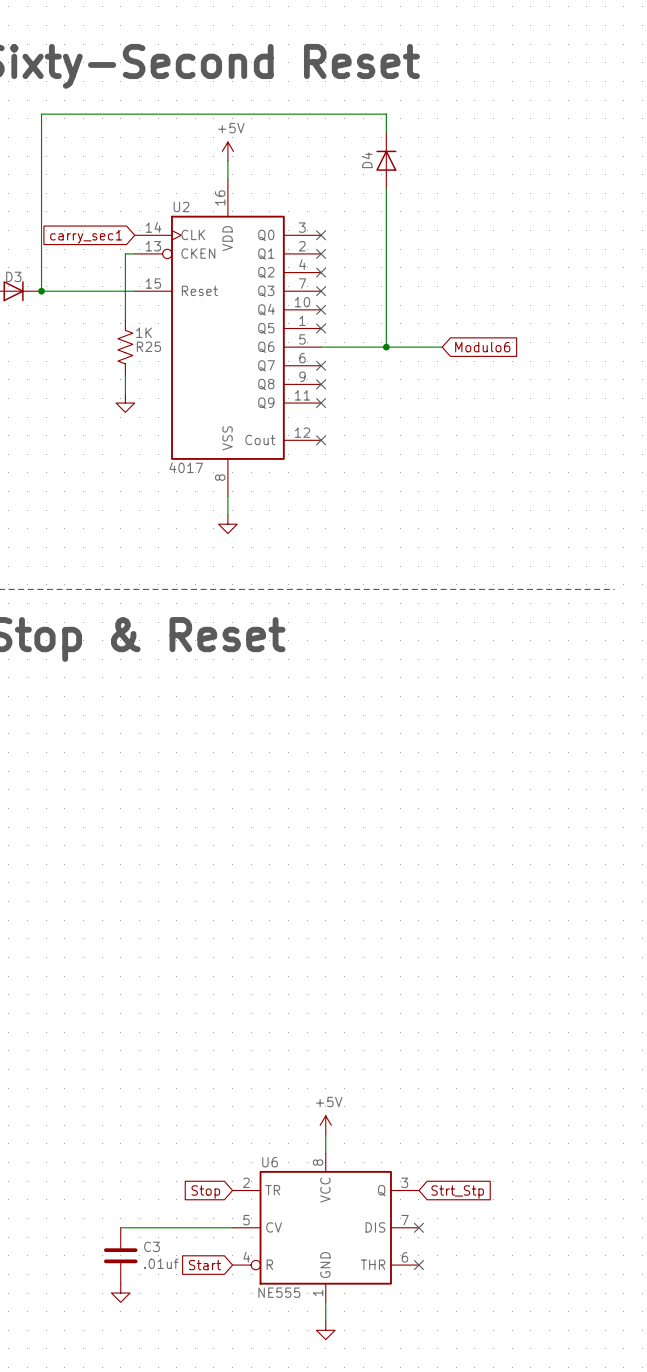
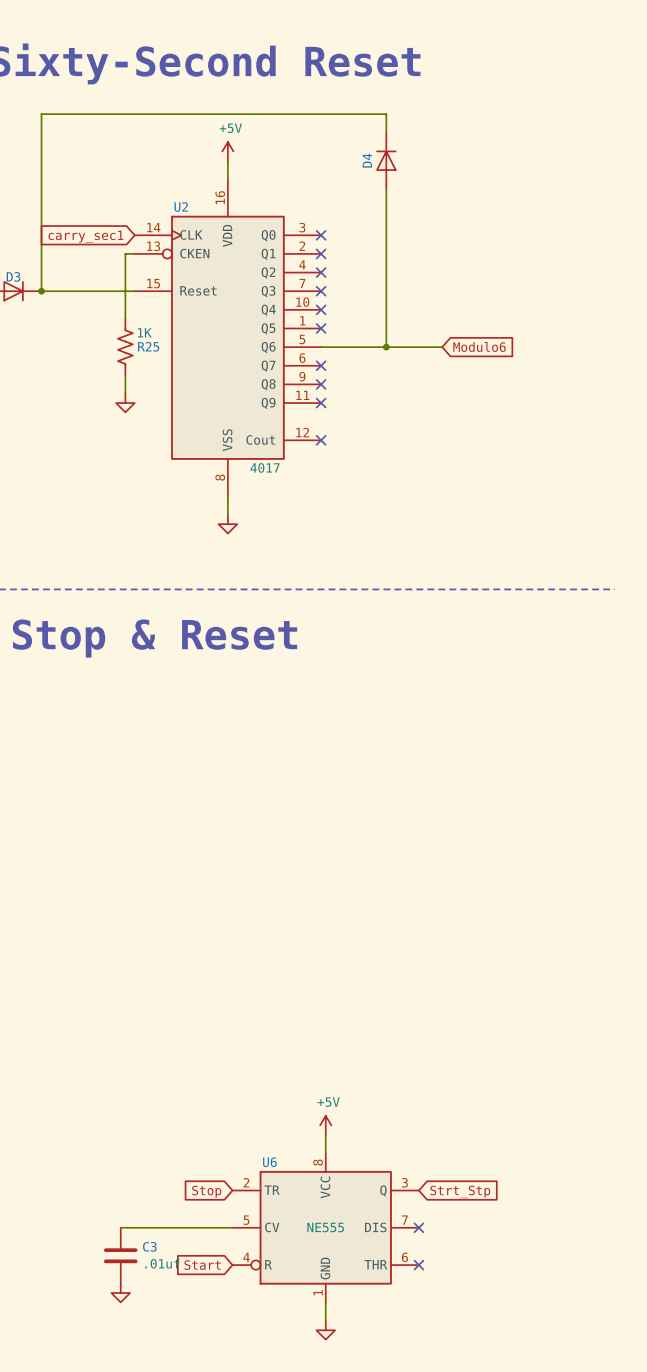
U2 value position: 4017 (186, 467) -> 4017 (265, 467)
U6 value position: NE555 (279, 1292) -> NE555 (325, 1227)

